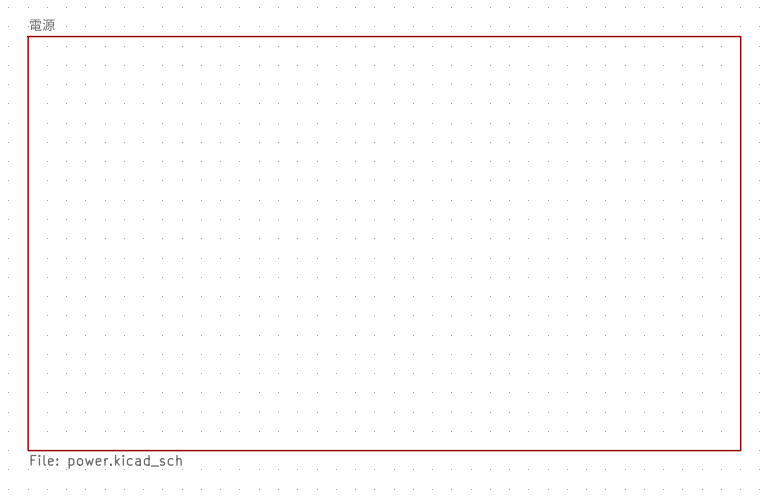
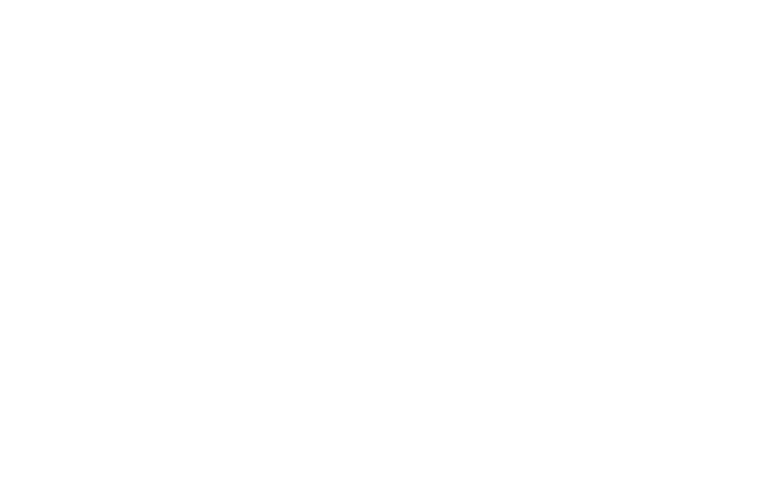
sheet 電源: File: power.kicad_sch (384, 243) -> none

